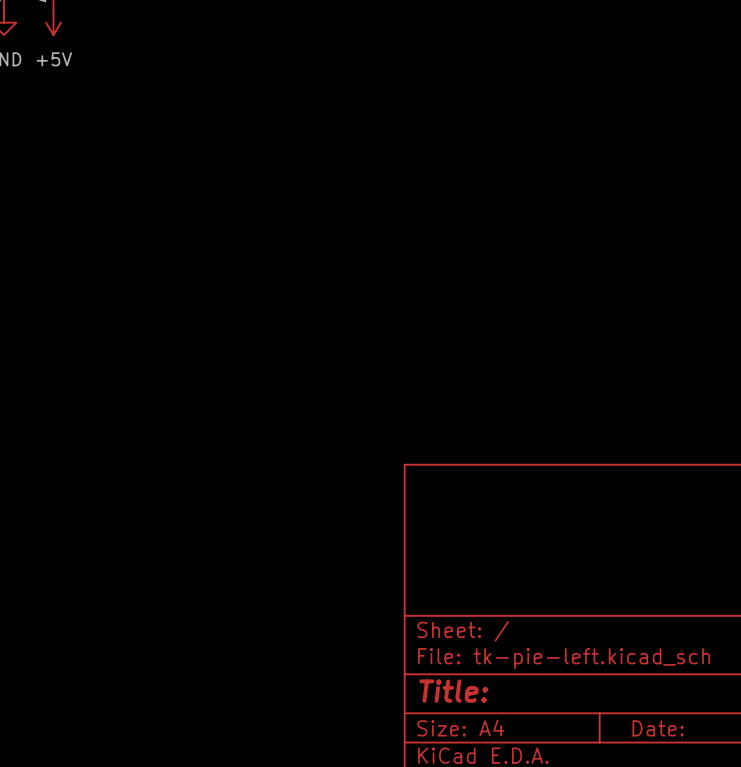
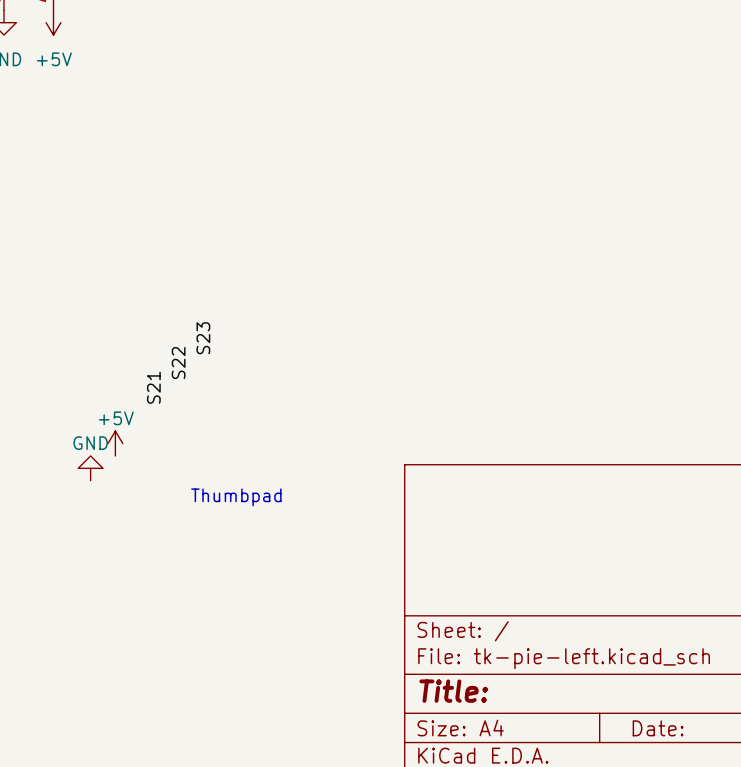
label: none -> S23 (203, 338)
label: none -> S22 (178, 363)
label: none -> S21 (153, 387)
power symbol: none -> +5V (115, 443)
power symbol: none -> GND (90, 468)
text: none -> Thumbpad (236, 497)

